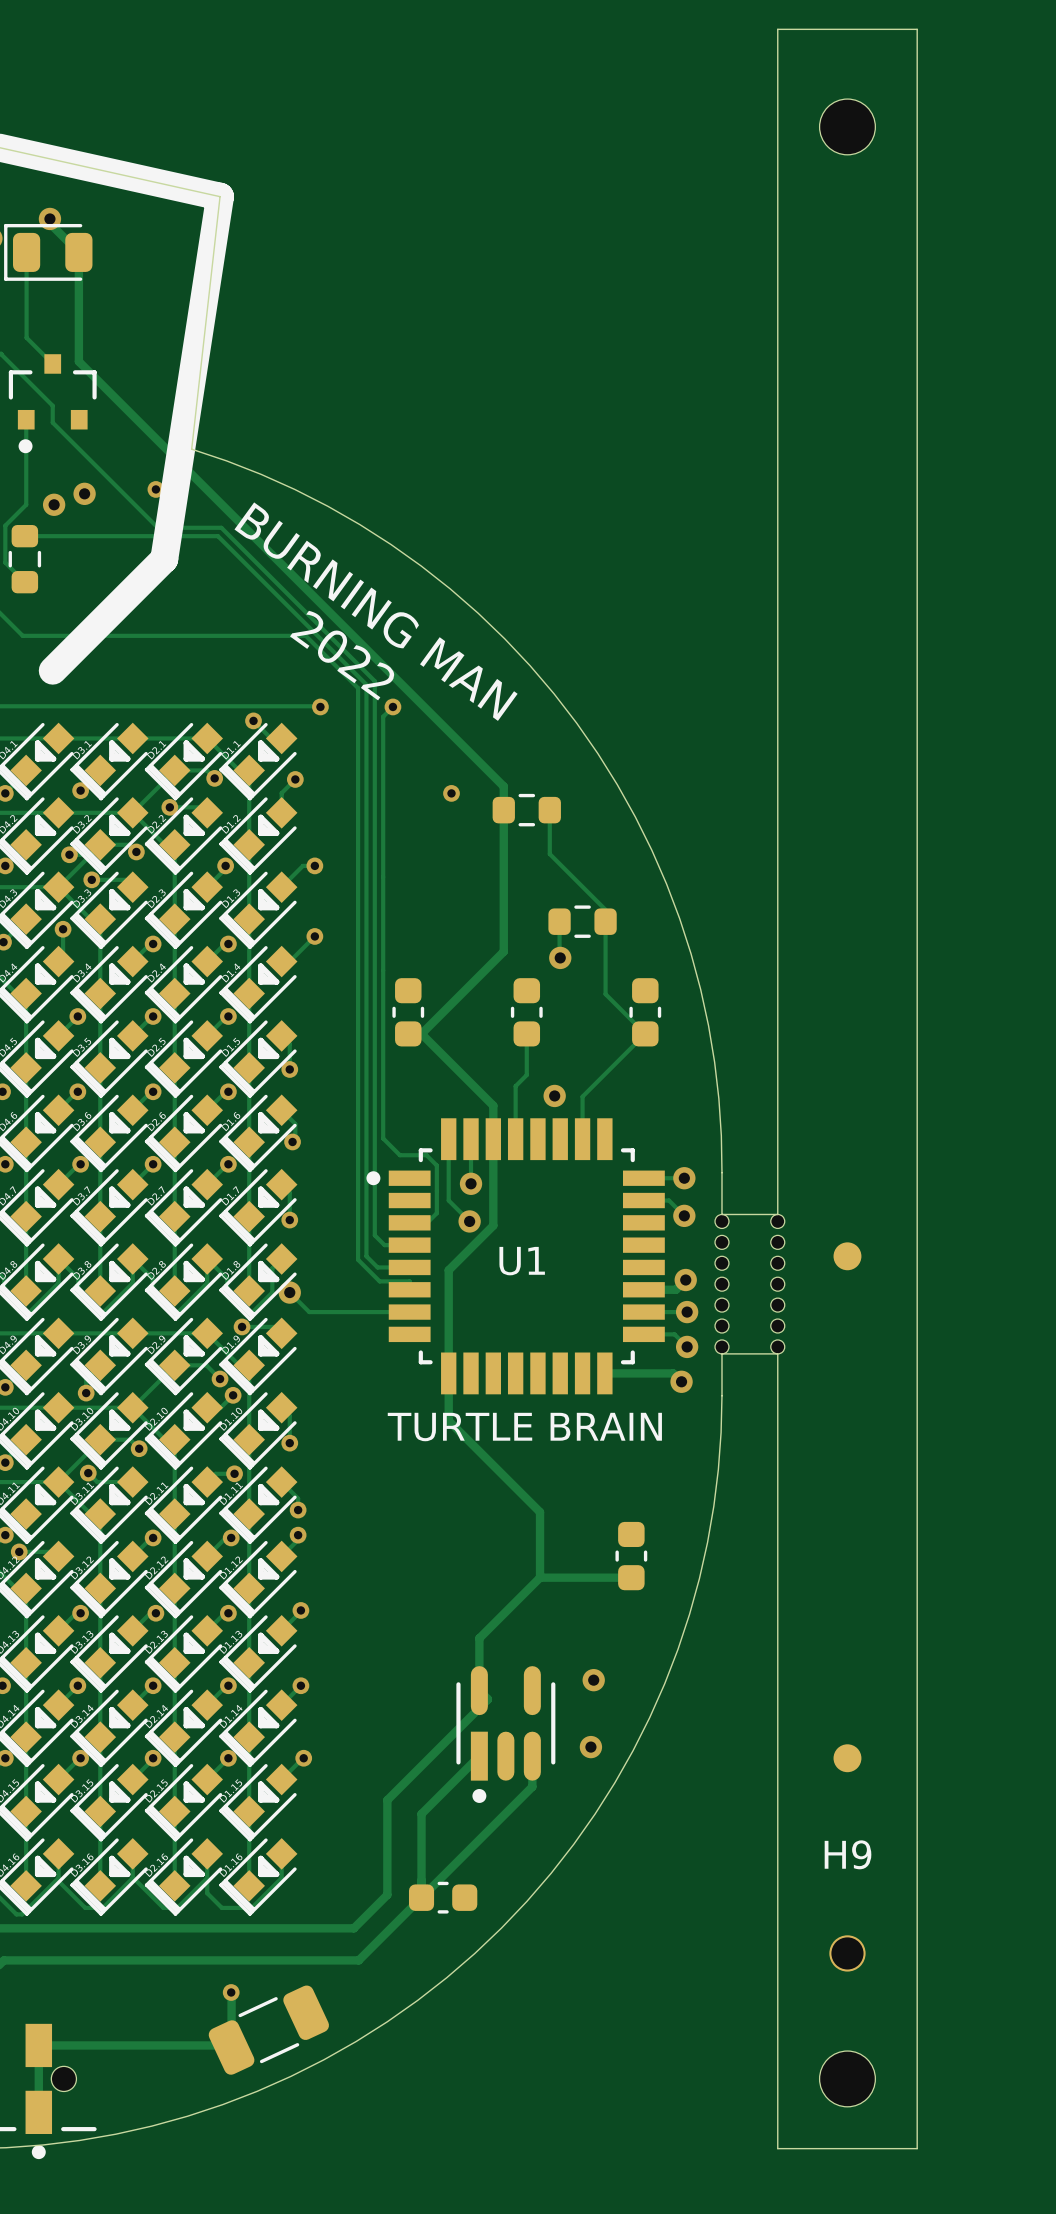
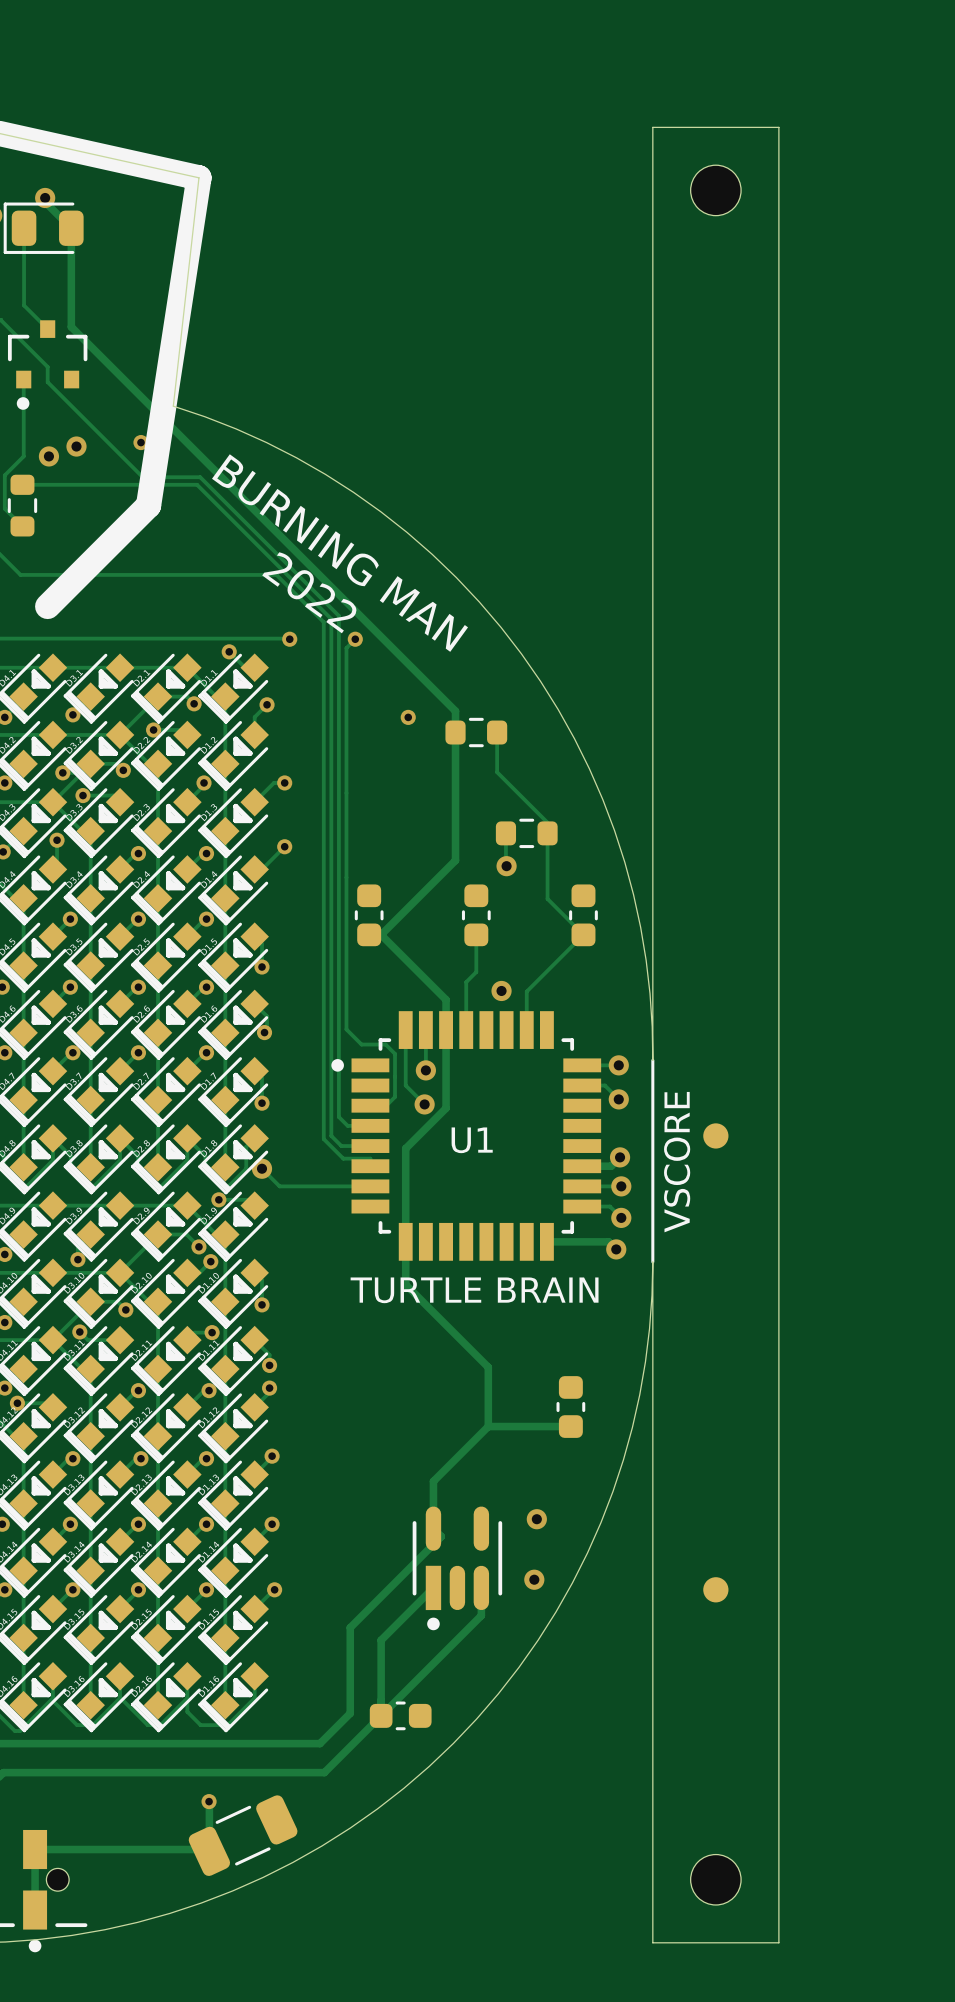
part position: (847, 126) -> (715, 190)
board edge: (721, 1172) (721, 1214) (777, 1214) (777, 29) (917, 29) (917, 2148) (861, 2148) -> (652, 1060) (652, 127) (778, 127) (778, 1942)
line: none -> (652, 1060) (652, 1262)
part position: (847, 1256) -> (715, 1135)
part: (749, 1284) -> none
text: none -> VSCORE (677, 1162)
board edge: (721, 1395) (721, 1353) (777, 1353) (777, 2148) -> (652, 1262) (652, 1942) (703, 1942)
part position: (847, 1758) -> (715, 1589)
H9: (847, 1953) -> none
part position: (847, 2078) -> (715, 1879)

